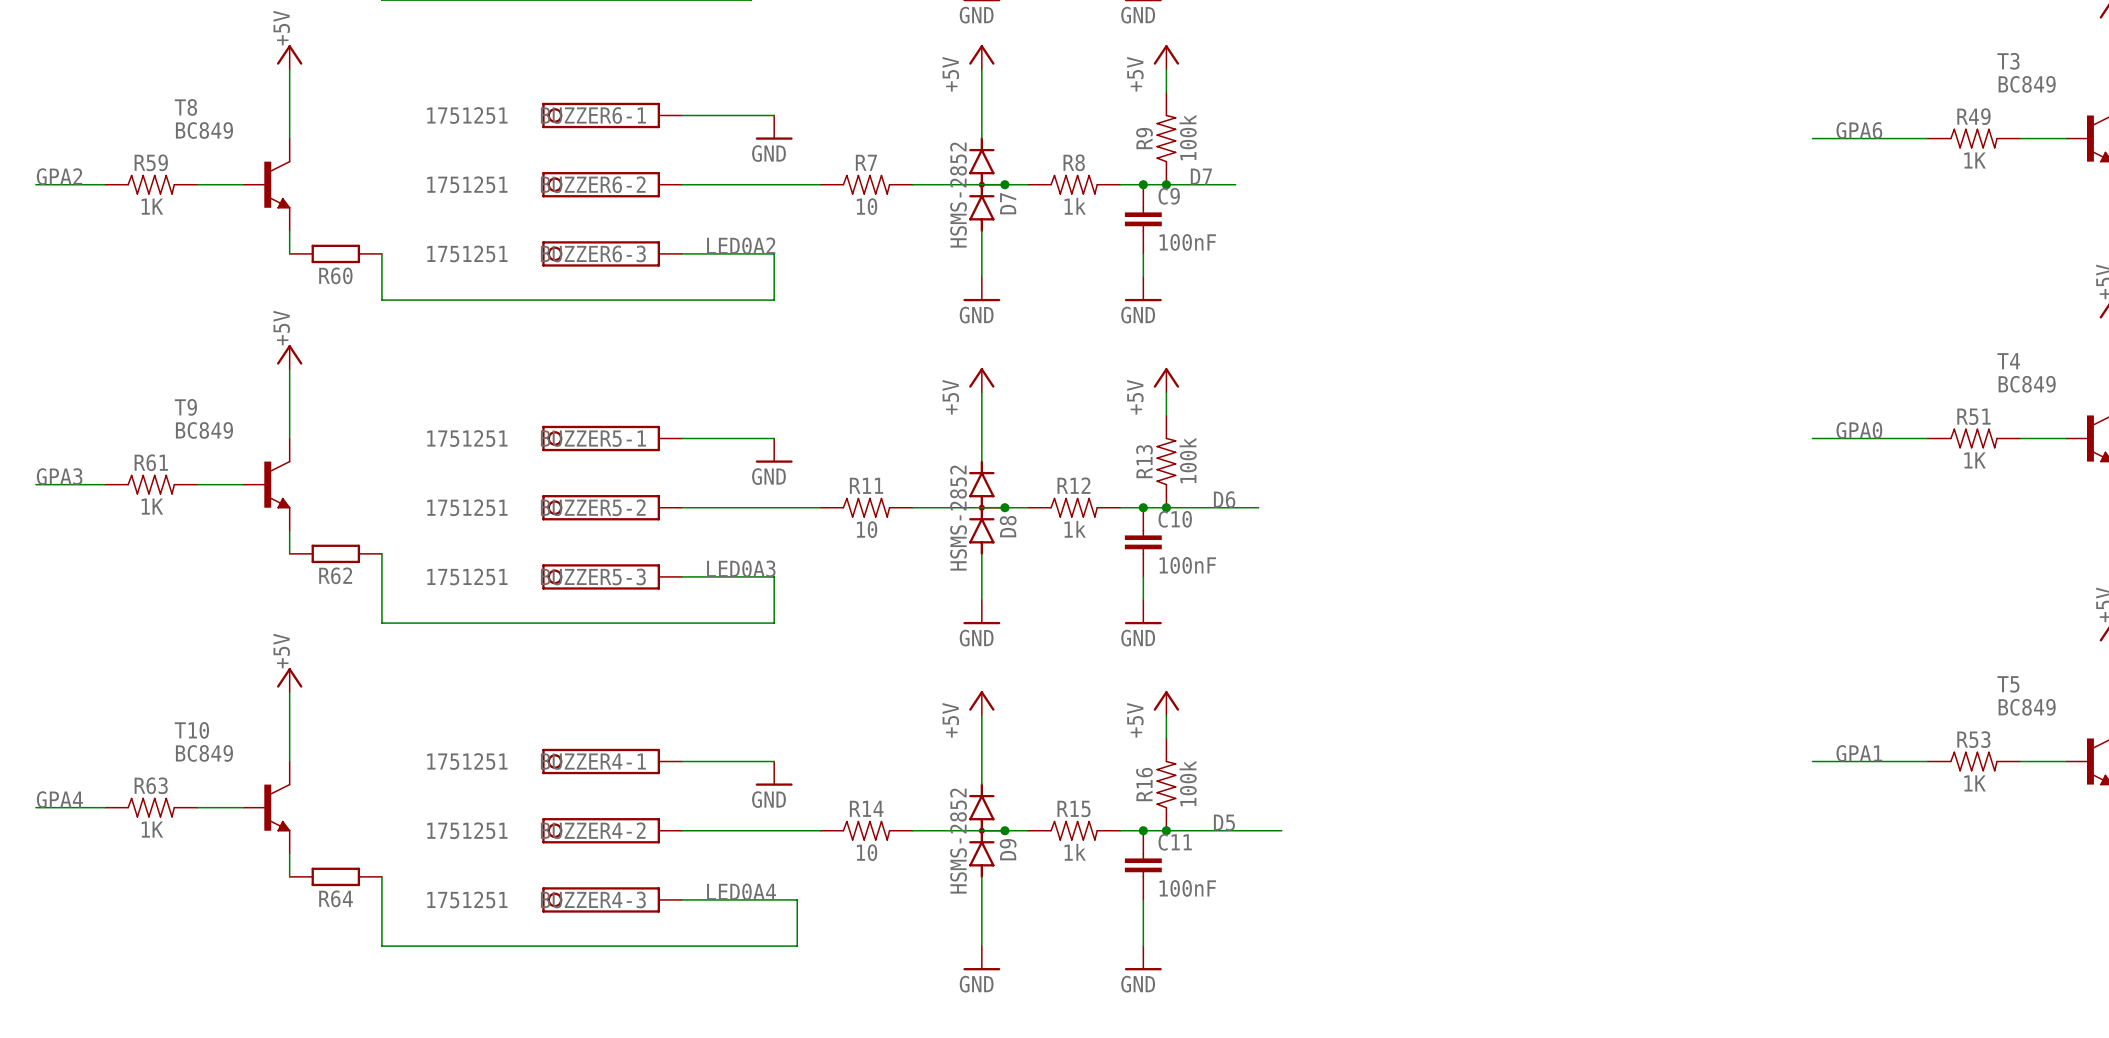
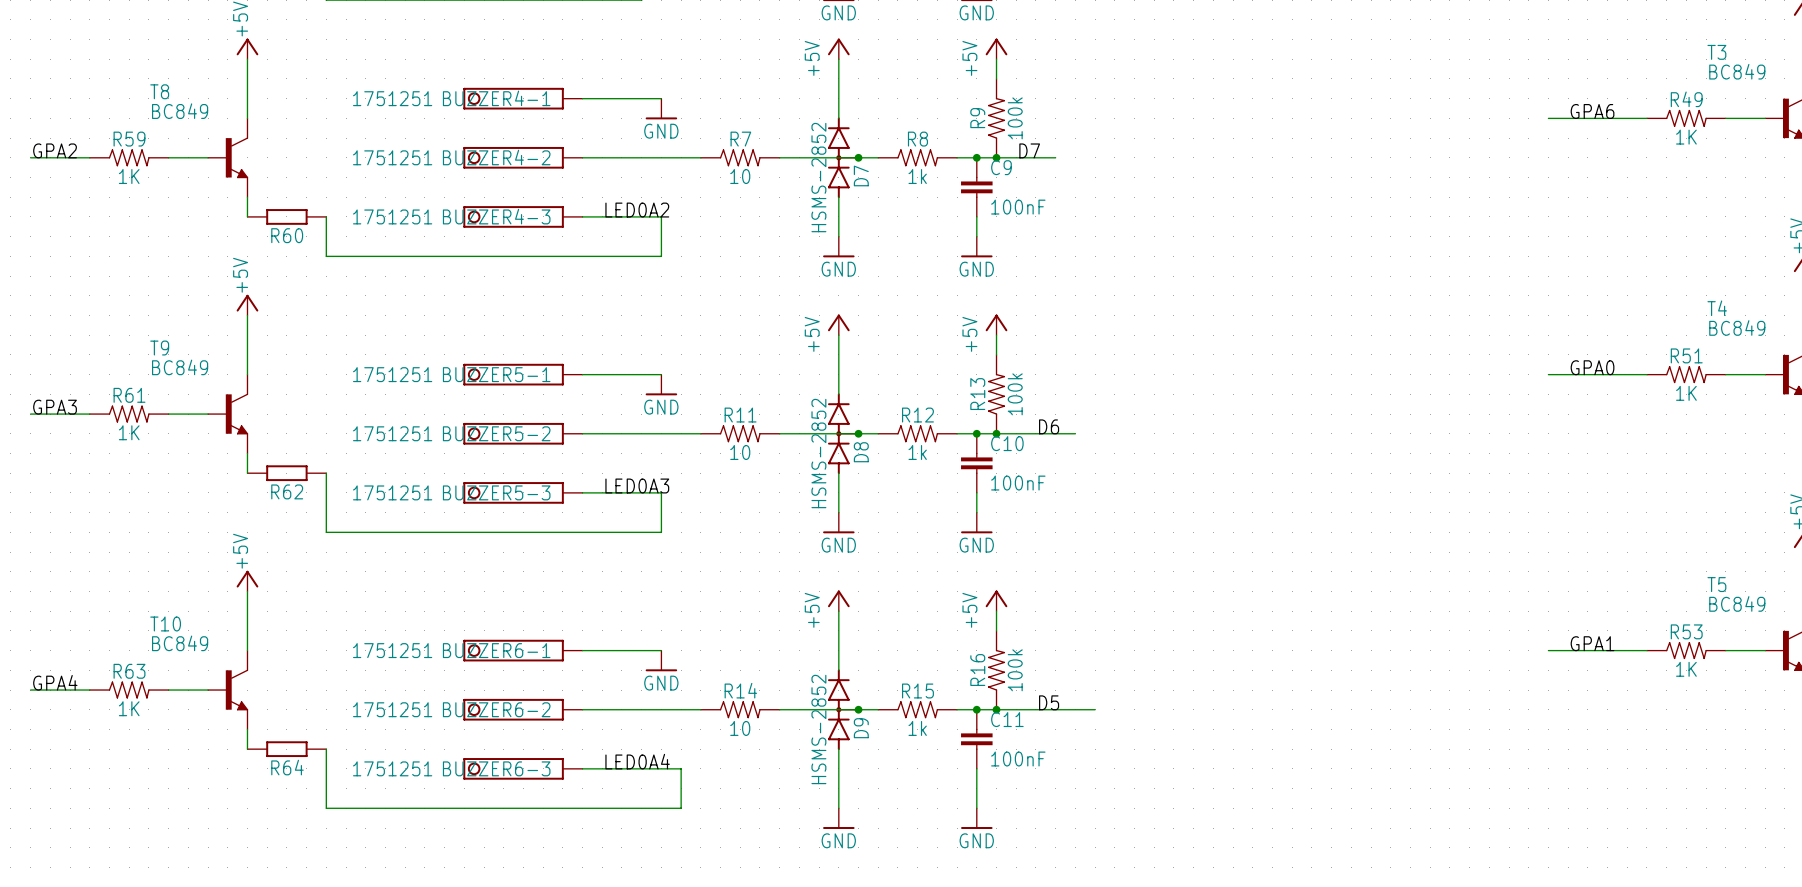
BUZZER6-1 name: BUZZER6-1 (593, 115) -> BUZZER4-1 (496, 98)
BUZZER6-2 name: BUZZER6-2 (593, 184) -> BUZZER4-2 (496, 157)
BUZZER6-3 name: BUZZER6-3 (593, 253) -> BUZZER4-3 (496, 216)
BUZZER4-1 name: BUZZER4-1 (593, 761) -> BUZZER6-1 (496, 650)
BUZZER4-2 name: BUZZER4-2 (593, 830) -> BUZZER6-2 (496, 709)
BUZZER4-3 name: BUZZER4-3 (593, 899) -> BUZZER6-3 (496, 768)

